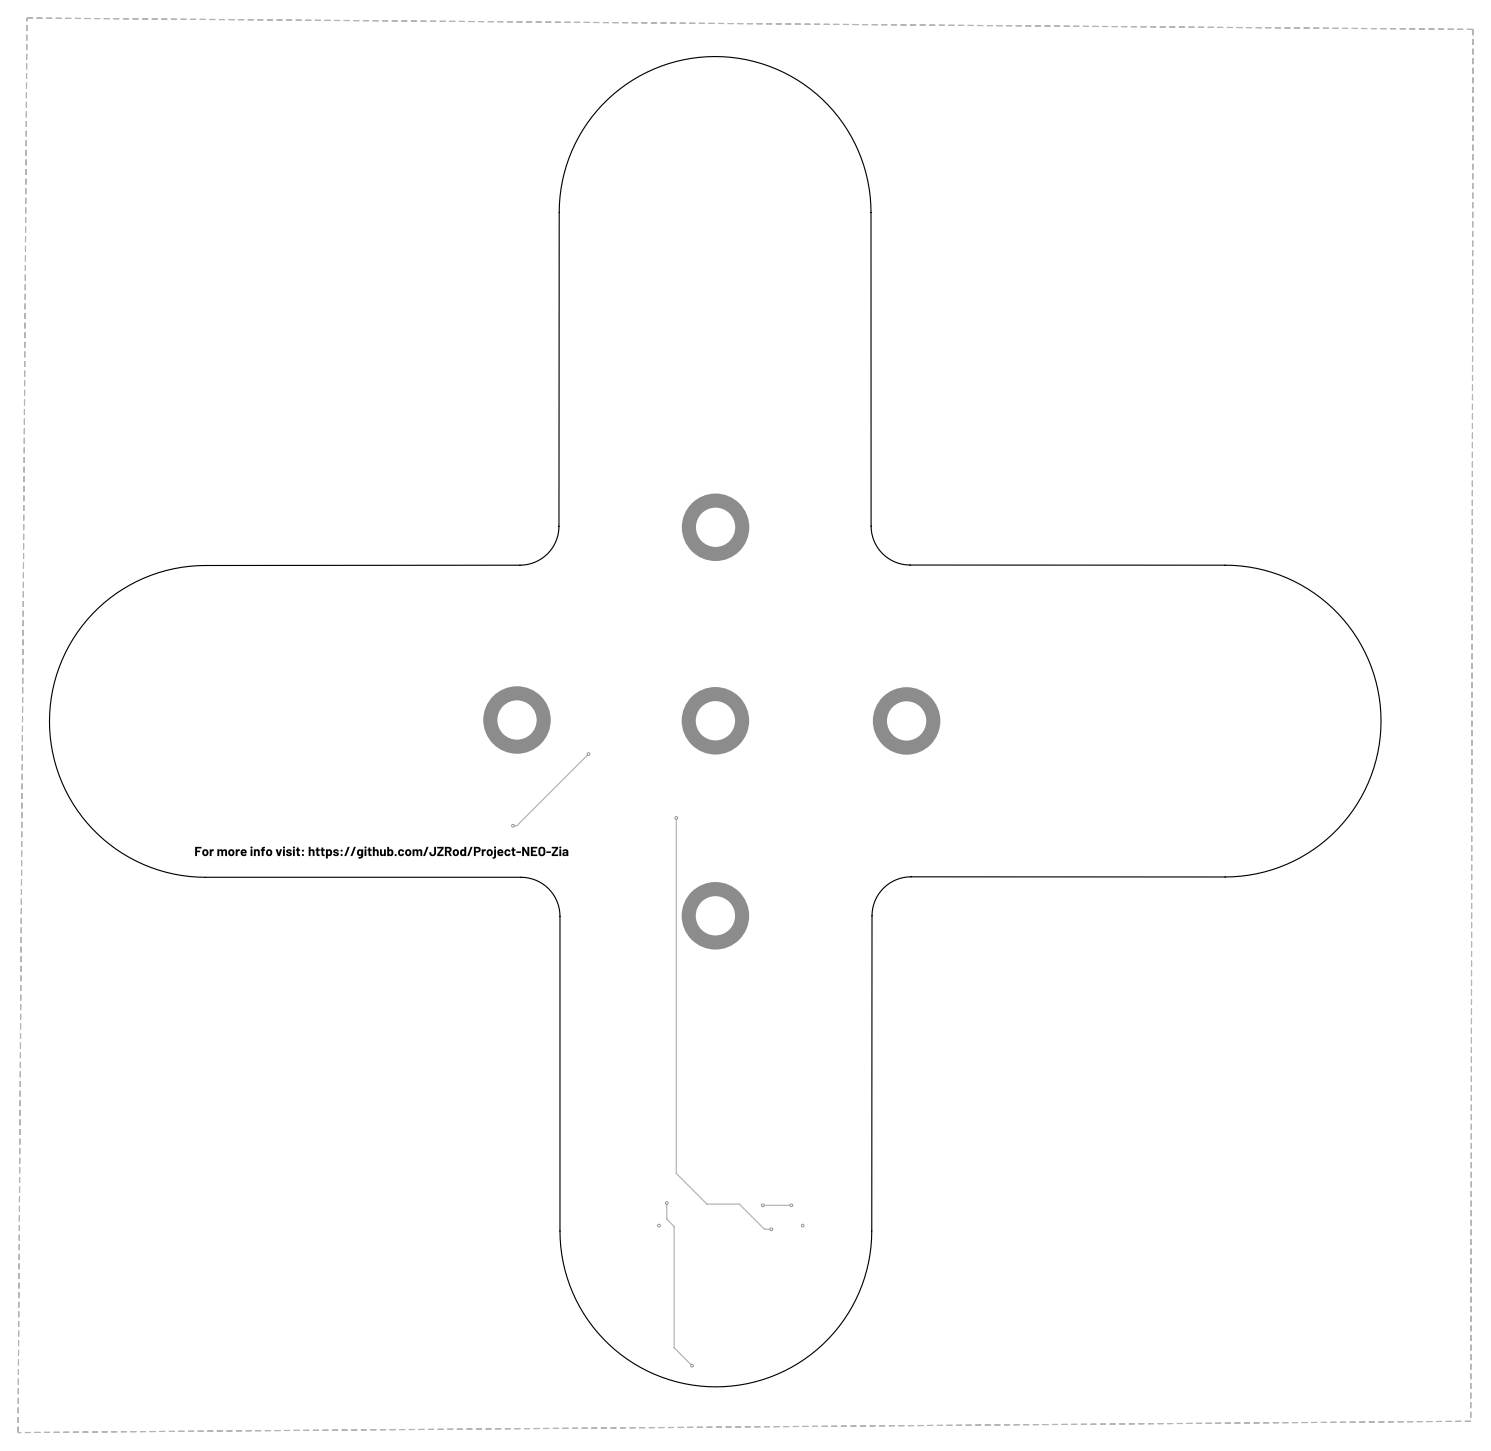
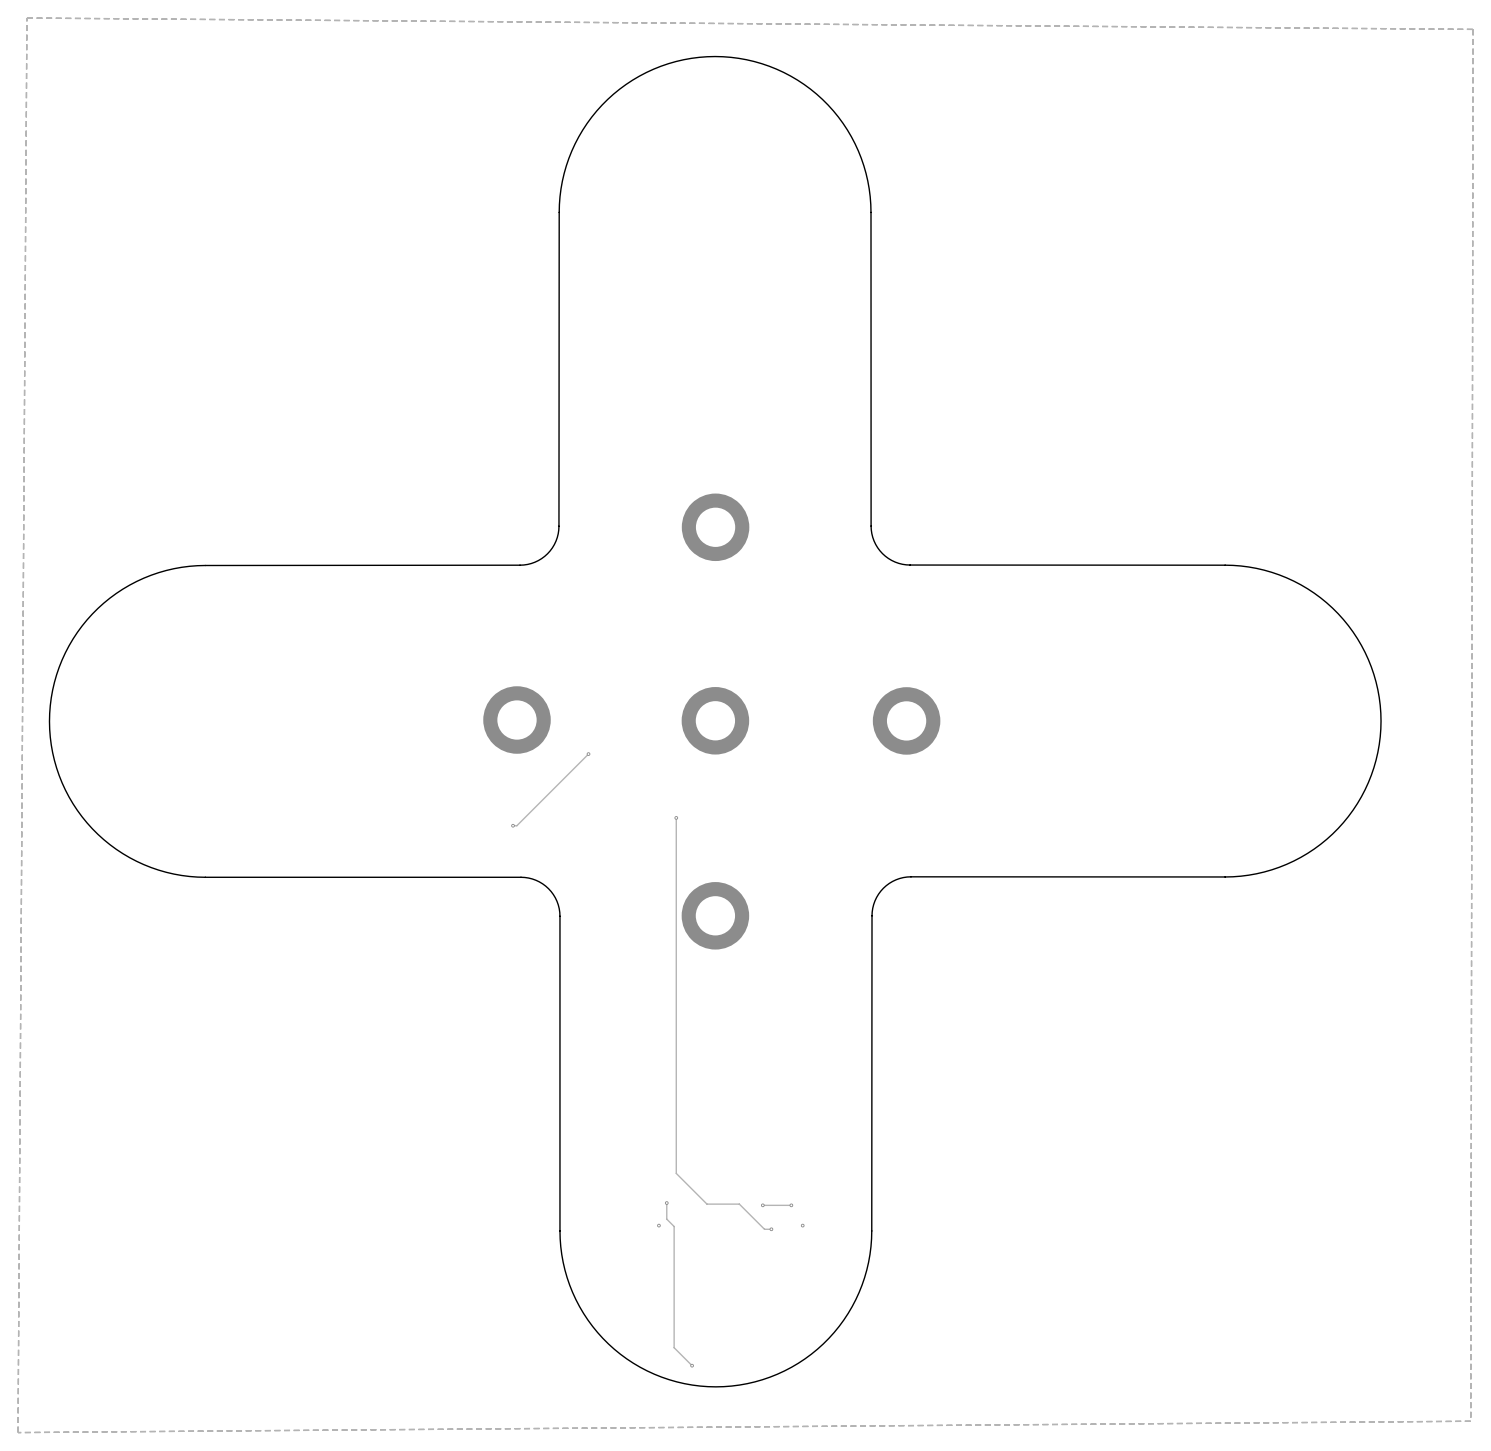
text: For more info visit: https://github.com/JZRod/Project-NEO-Zia (381, 852) -> none

